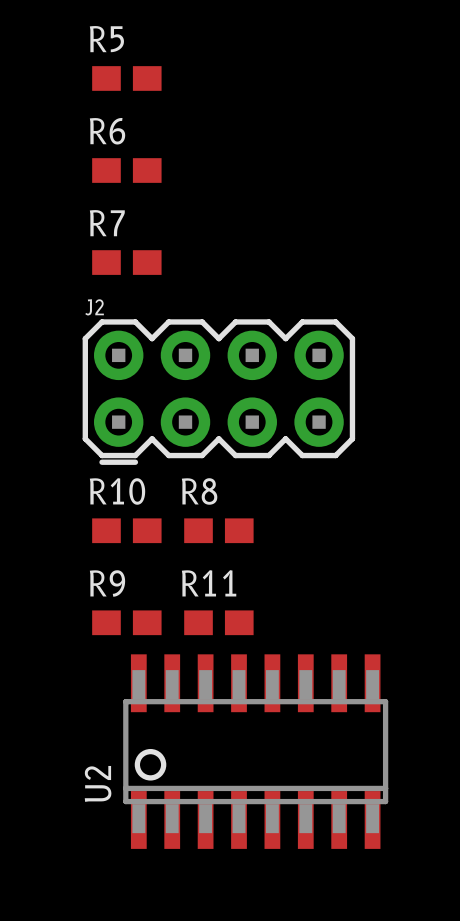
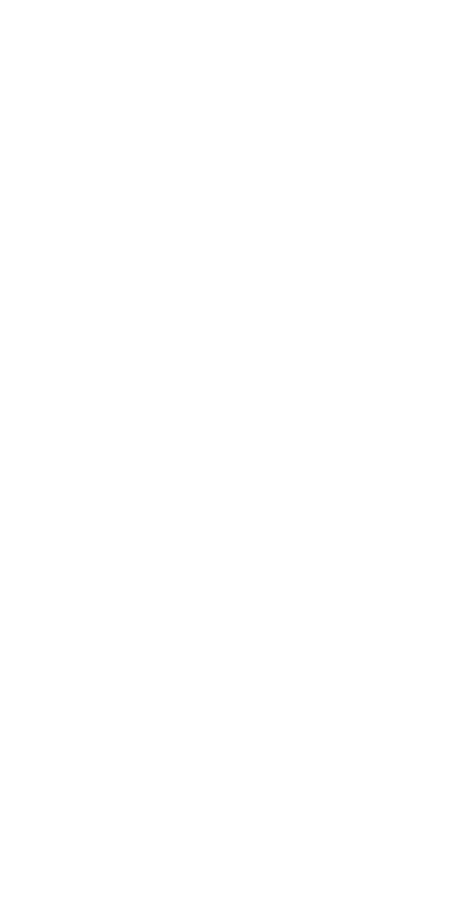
R5: (126, 78) -> none
R6: (126, 170) -> none
R7: (126, 262) -> none
J2: (218, 392) -> none
R10: (126, 530) -> none
R8: (218, 530) -> none
R9: (126, 622) -> none
R11: (218, 622) -> none
U2: (255, 751) -> none

